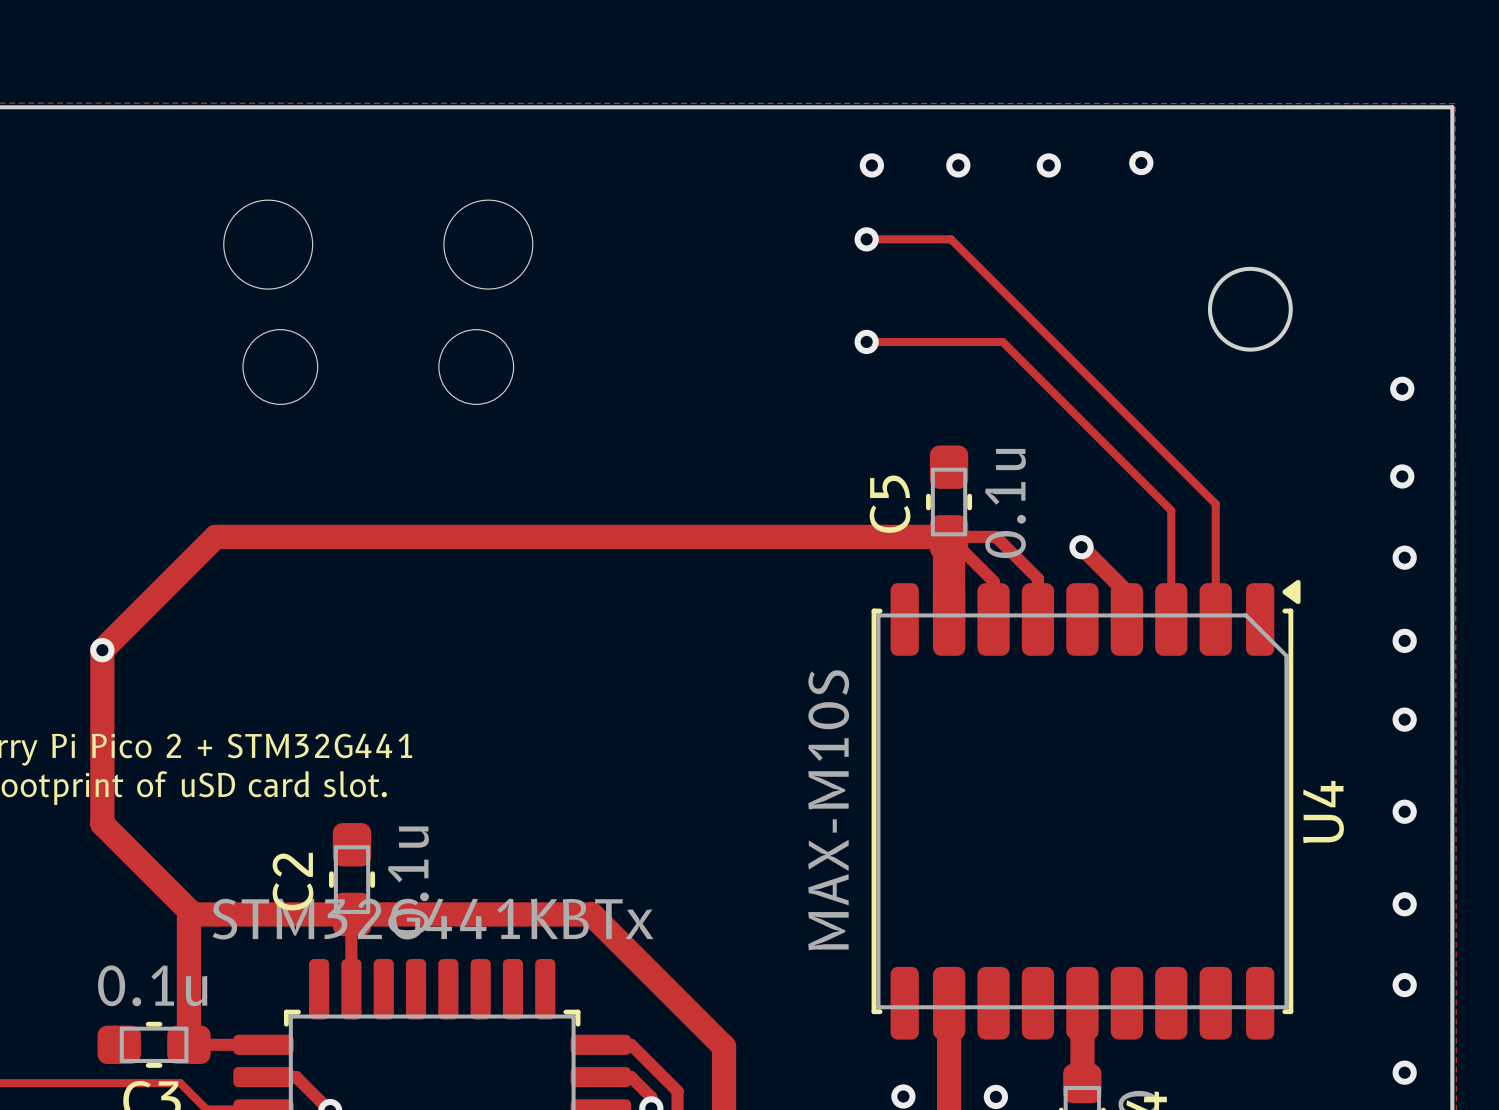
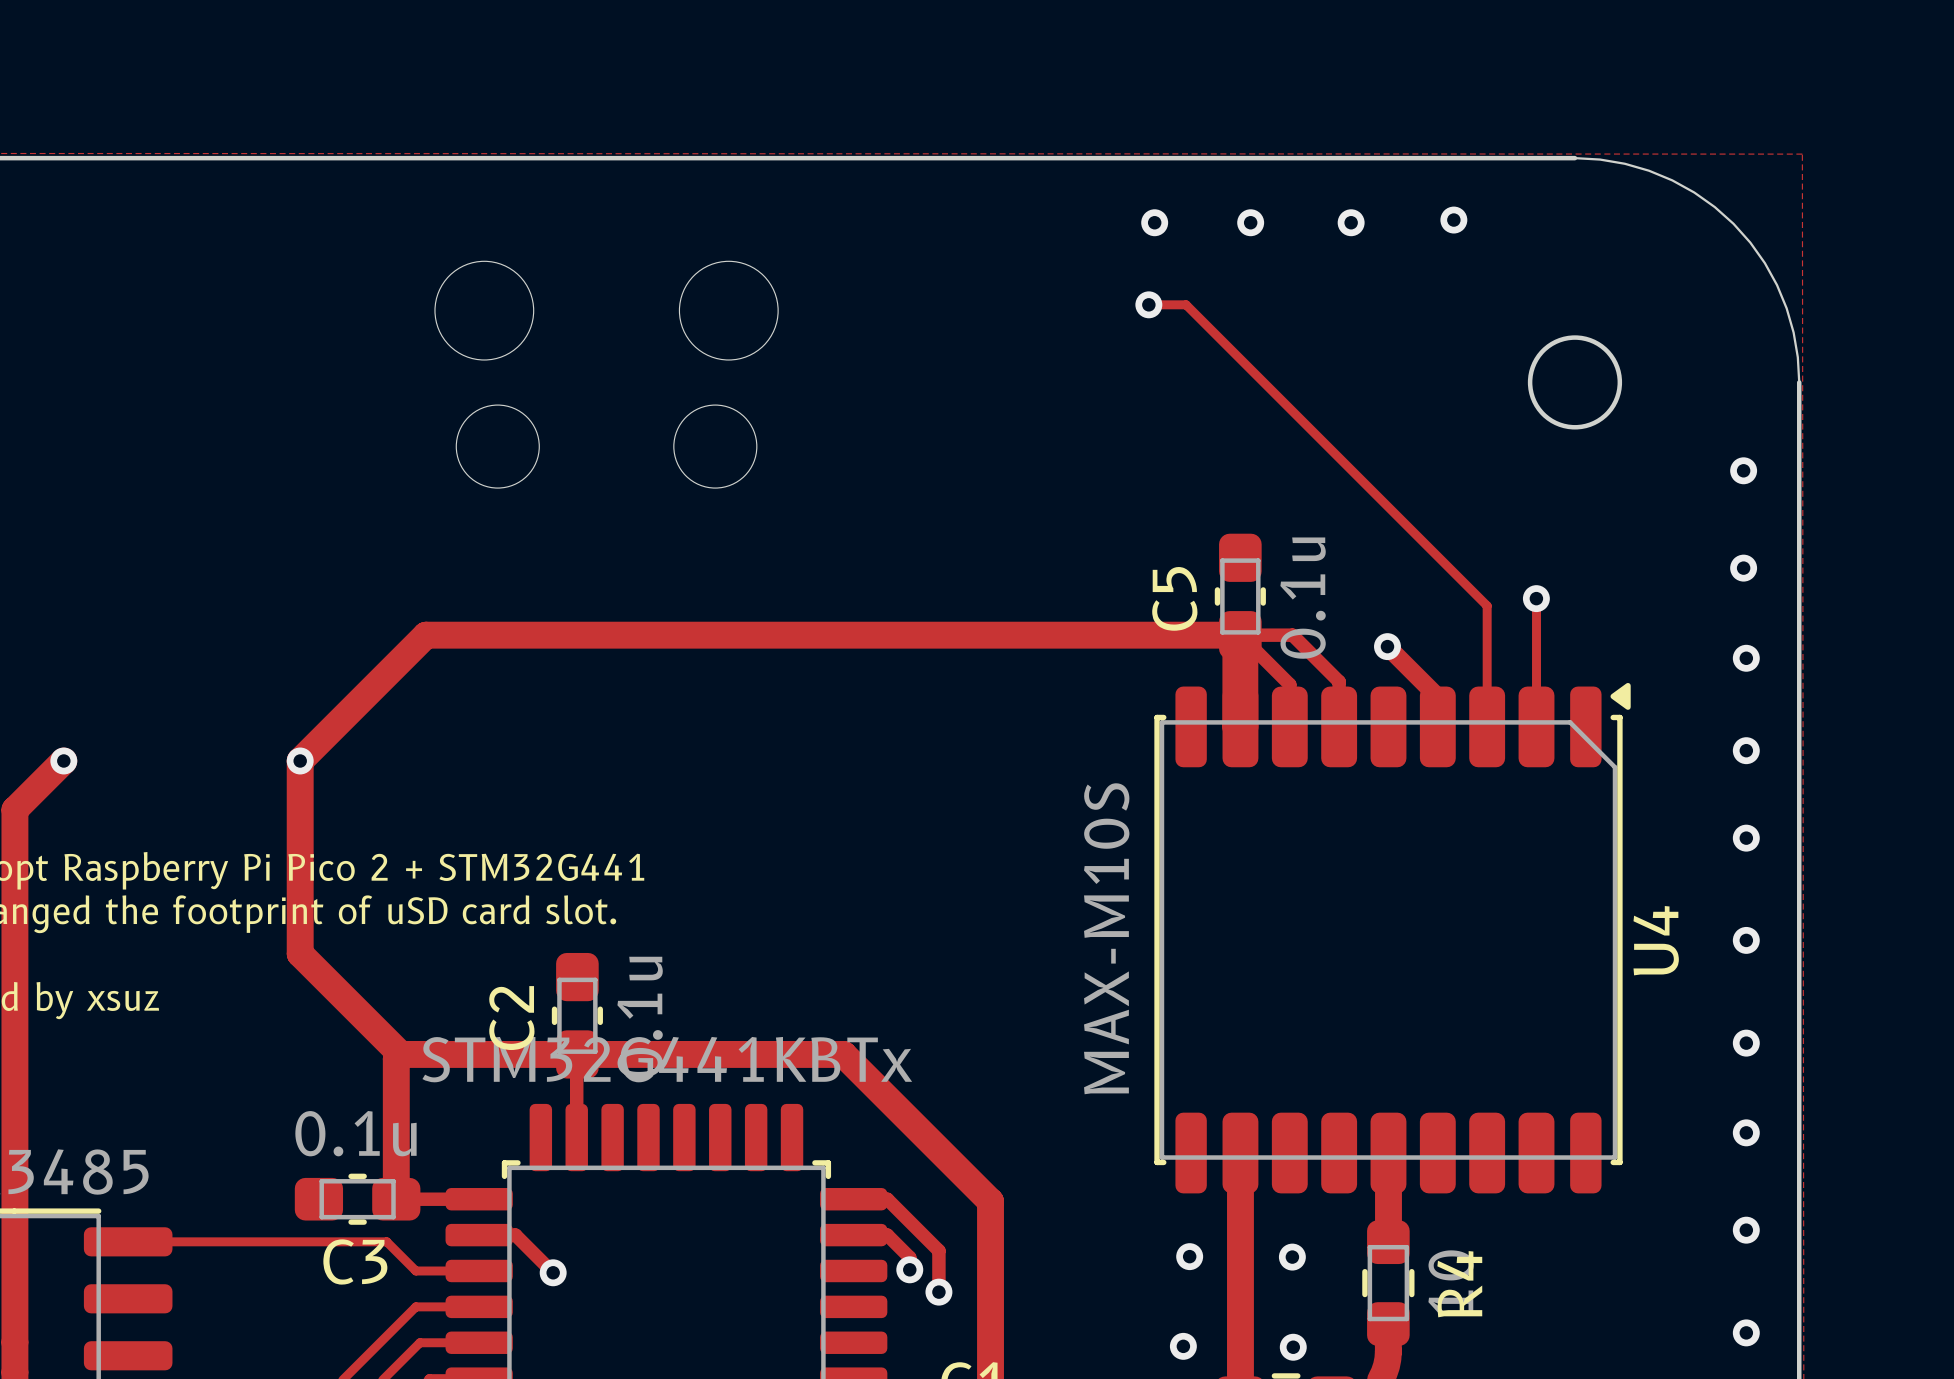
board edge: (1250, 107) (1452, 107) (1452, 309) -> (1574, 158) (1600, 159) (1649, 170) (1694, 192) (1733, 223) (1764, 263) (1786, 308) (1797, 357) (1799, 382)
track: (900, 239) (951, 239) (1215, 504) -> none
track: (866, 341) (1002, 341) -> (1186, 304) (1300, 418)
via: (866, 341) -> none
via: none -> (1536, 598)

